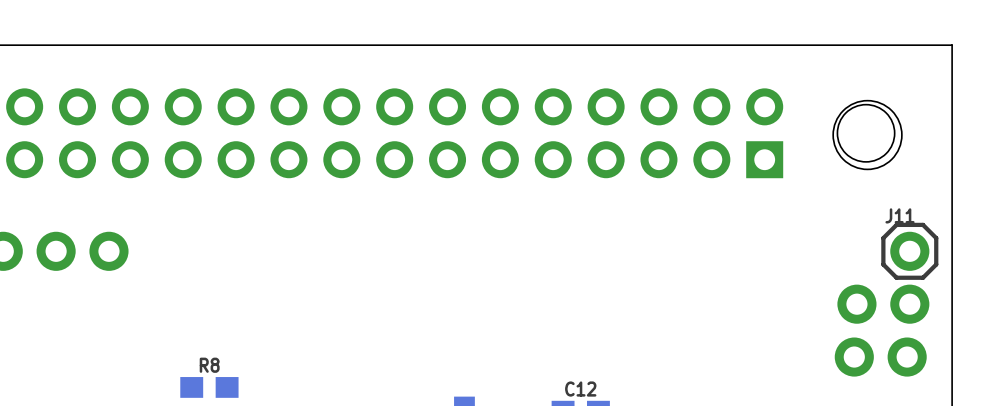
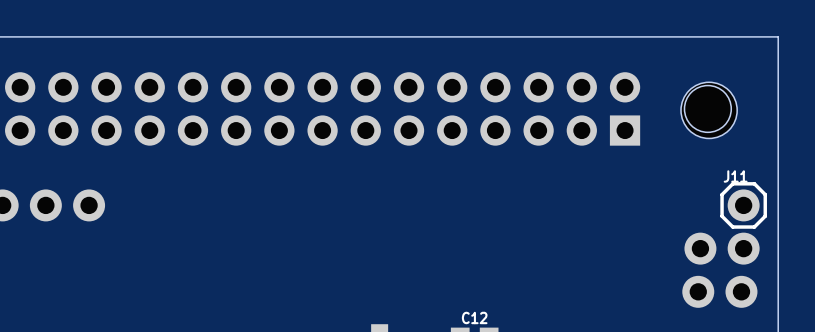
R8: (209, 387) -> none

